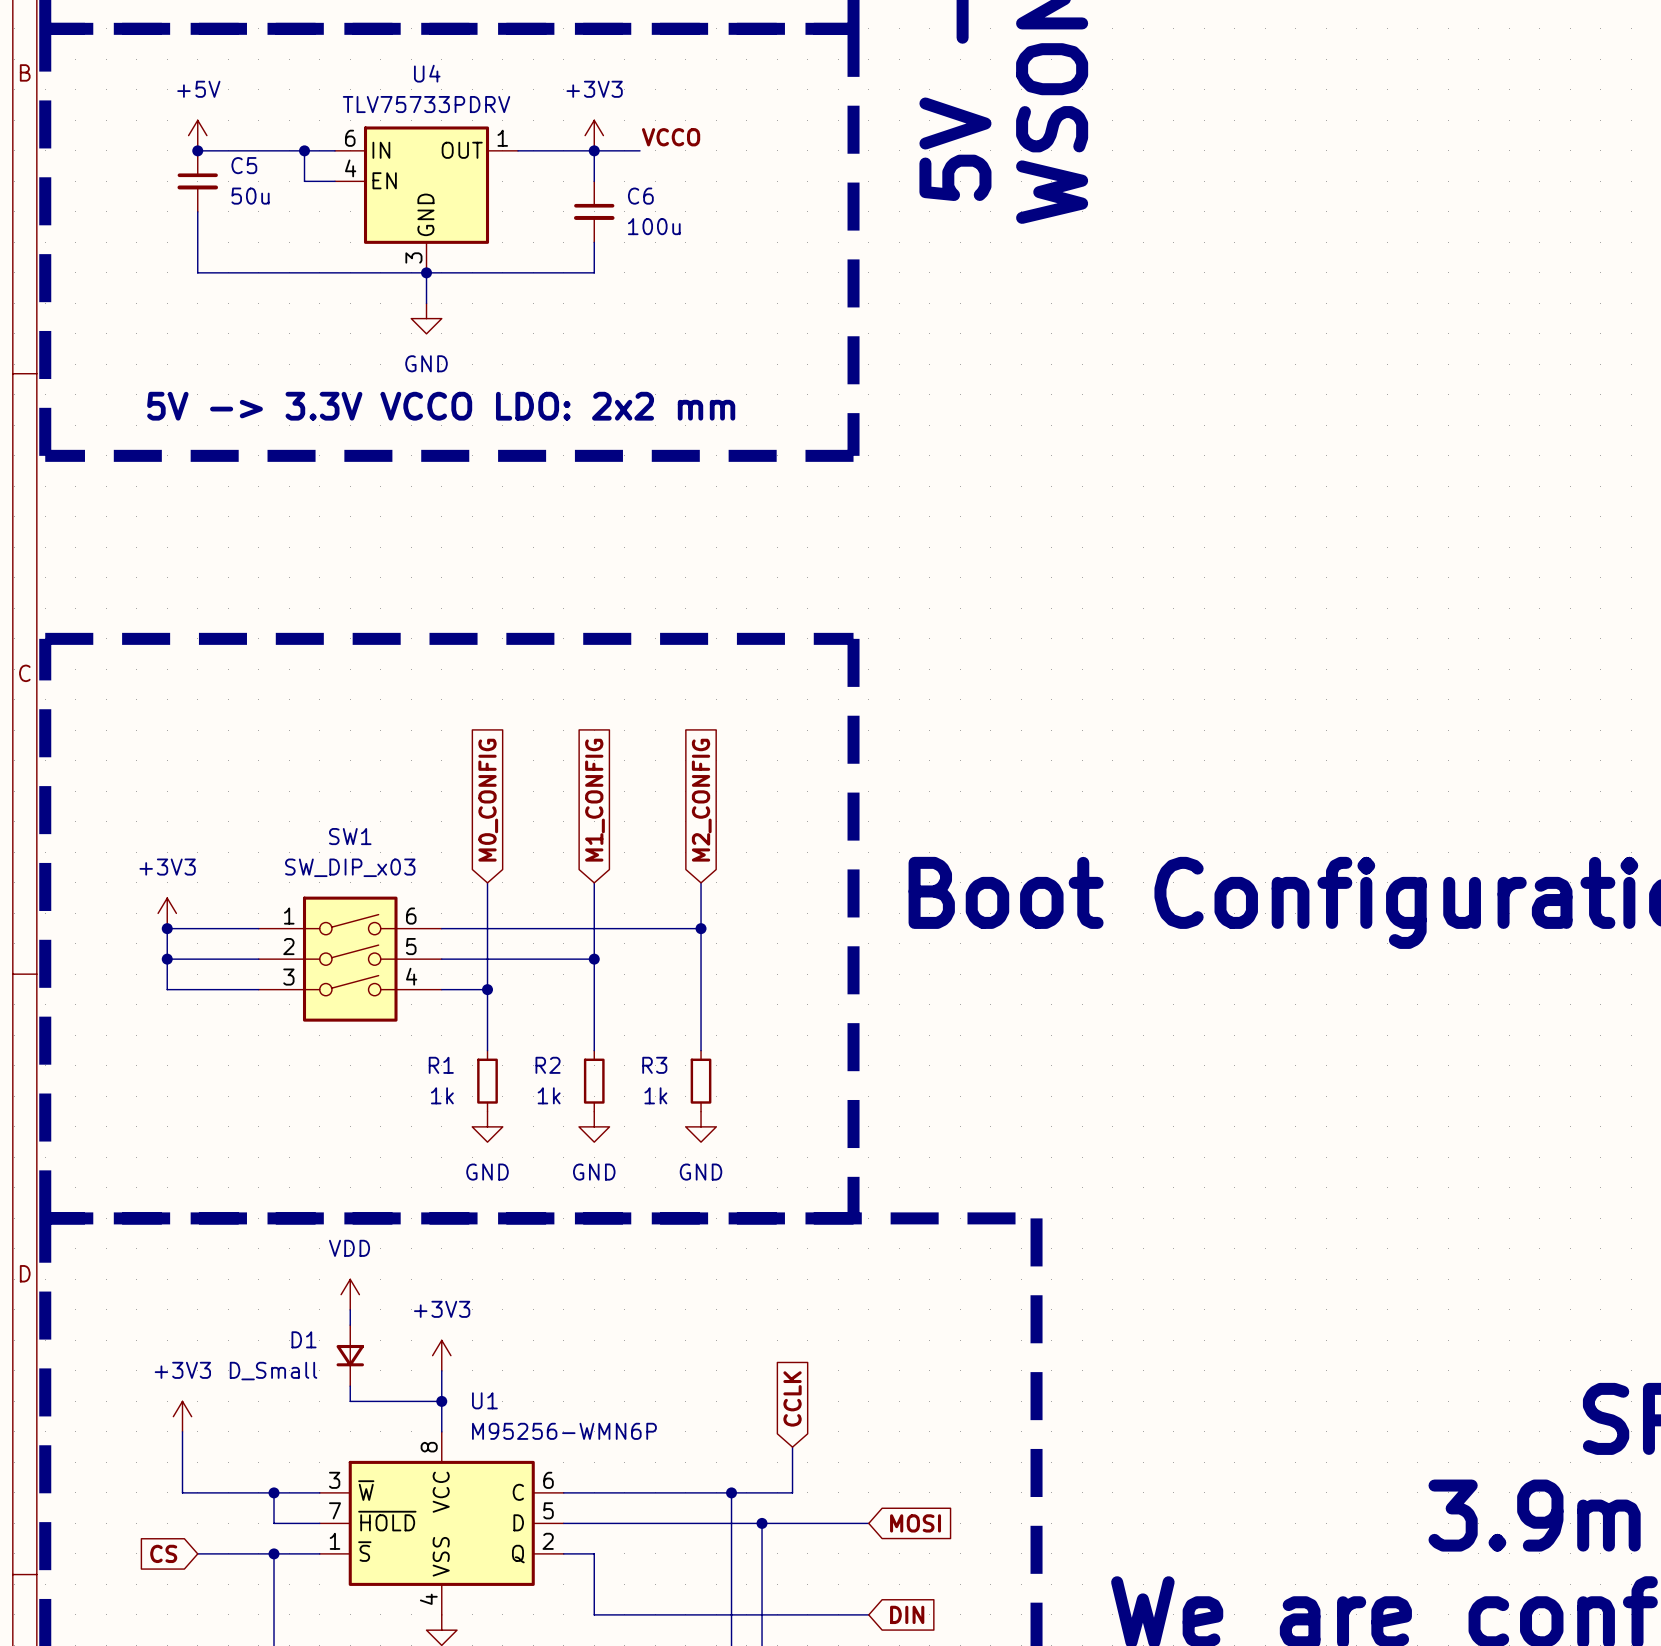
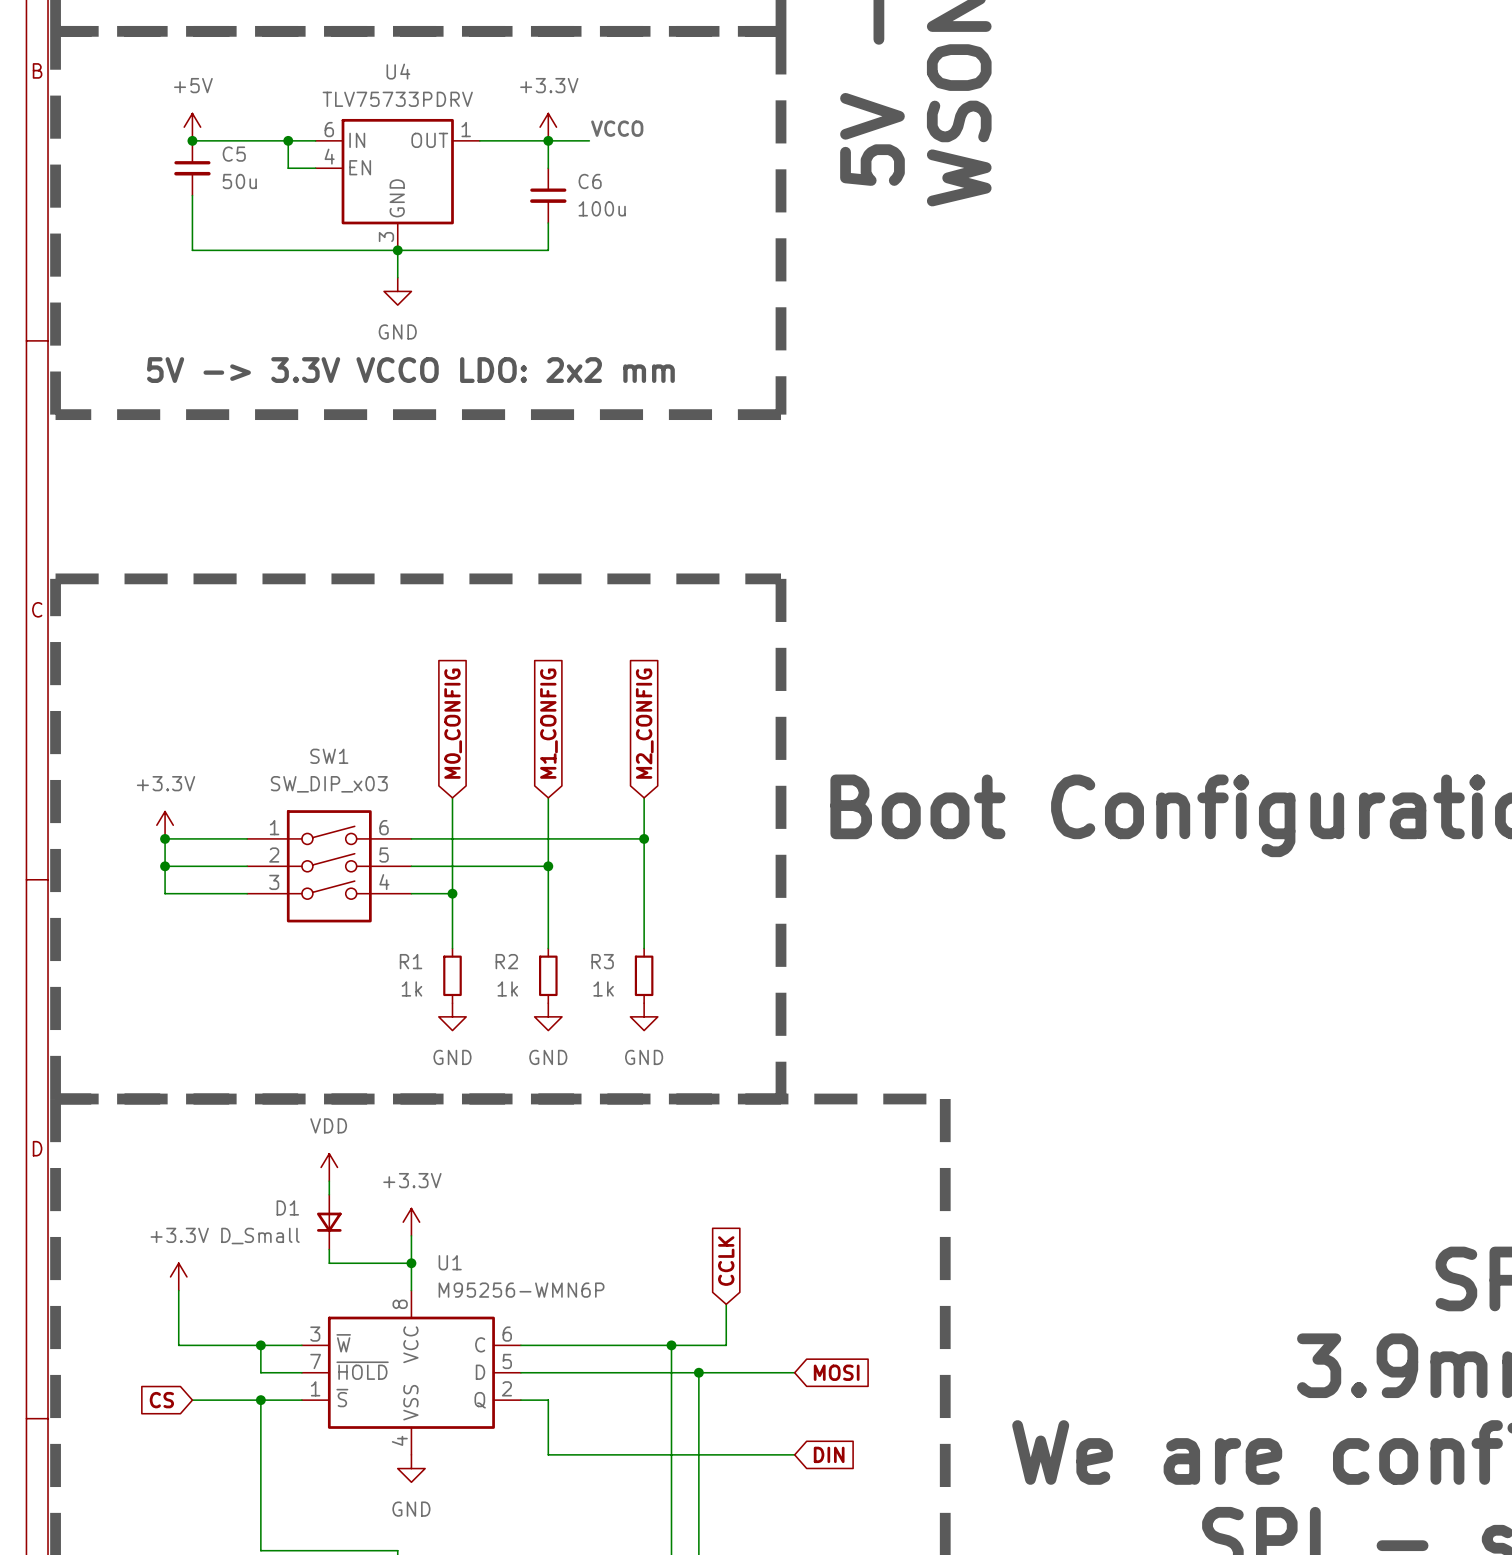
power symbol: +3V3 (594, 135) -> +3.3V (548, 127)
power symbol: +3V3 (167, 913) -> +3.3V (165, 825)
power symbol: +3V3 (441, 1355) -> +3.3V (411, 1222)
power symbol: +3V3 (182, 1416) -> +3.3V (178, 1276)

